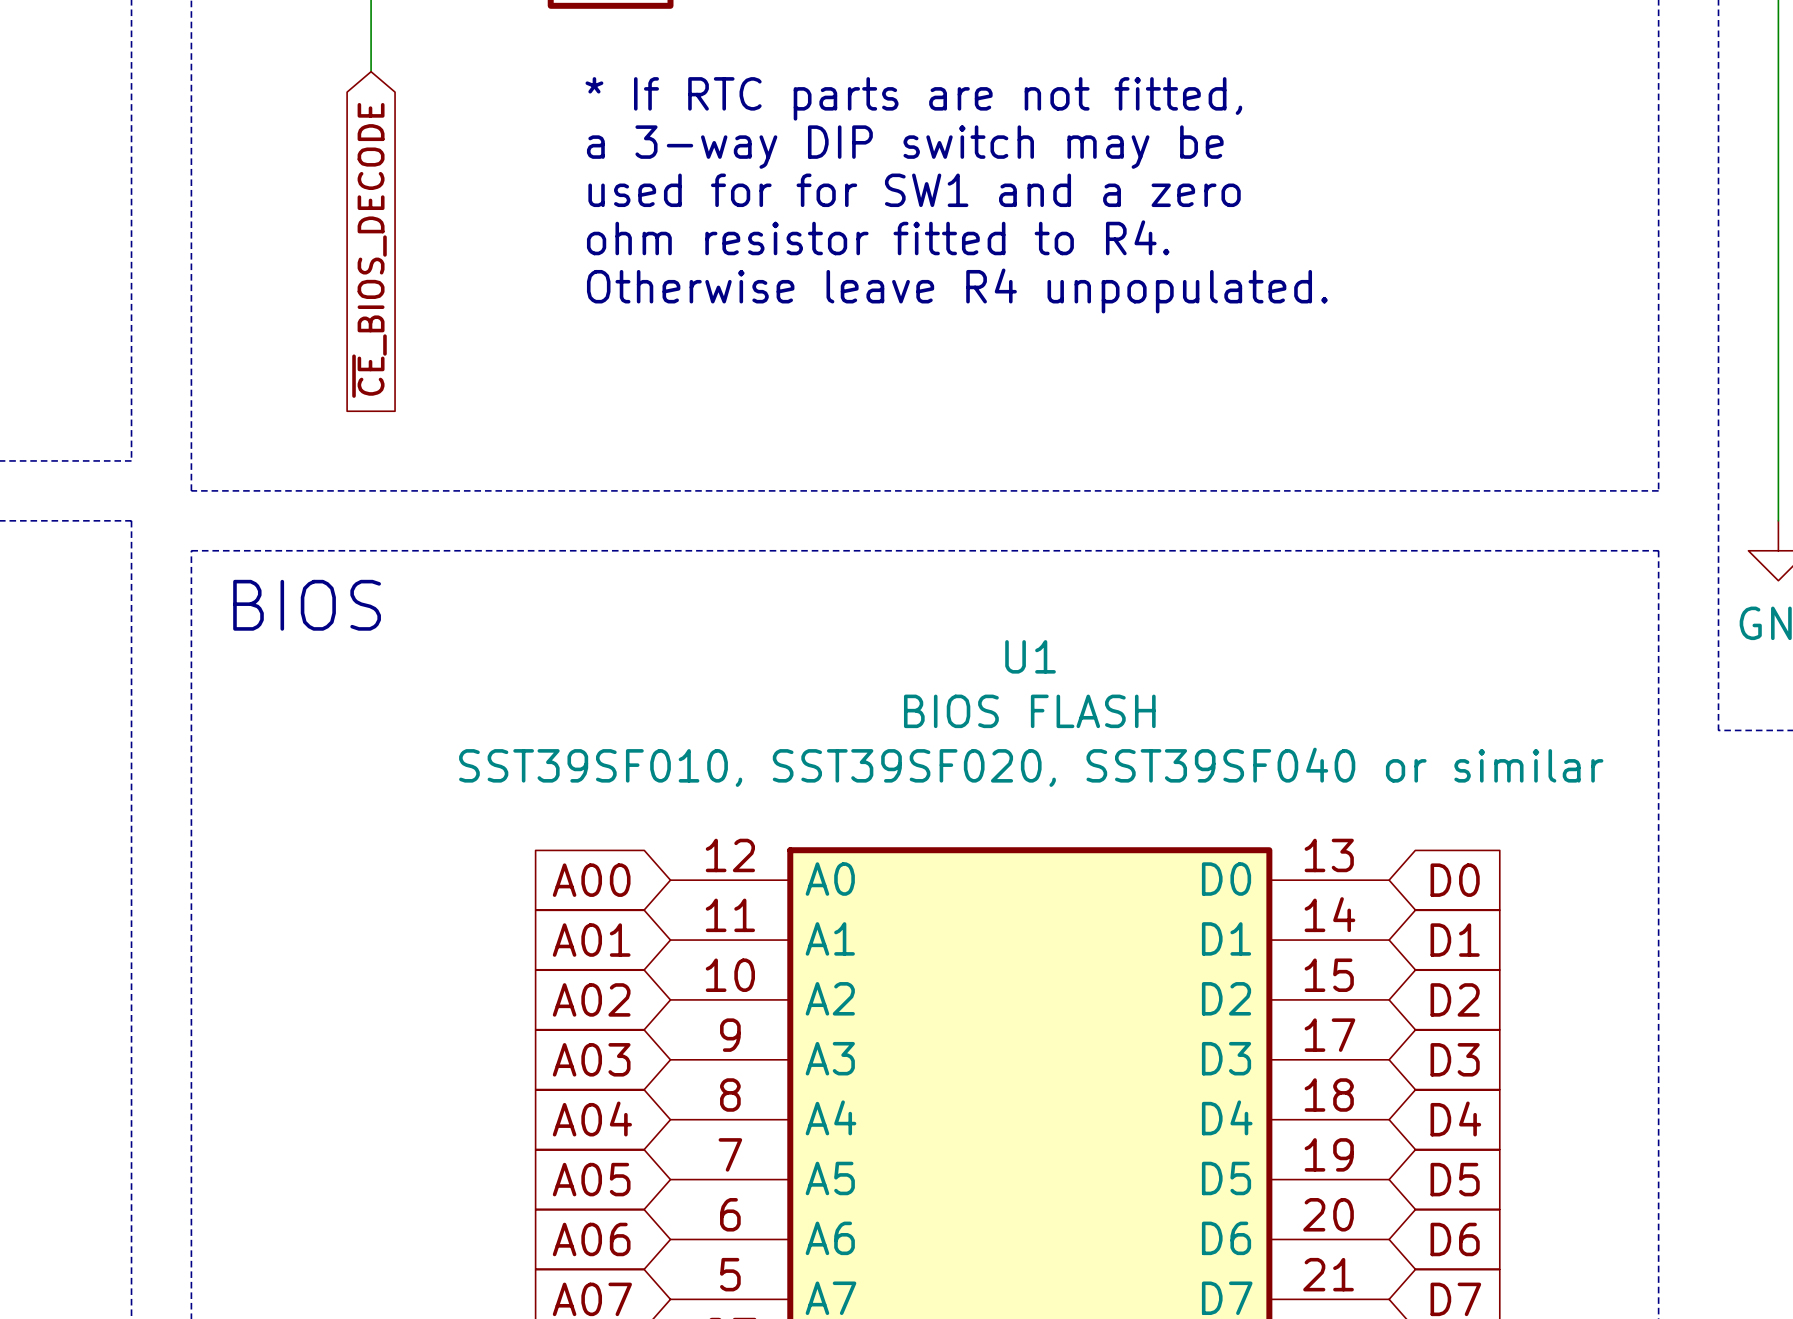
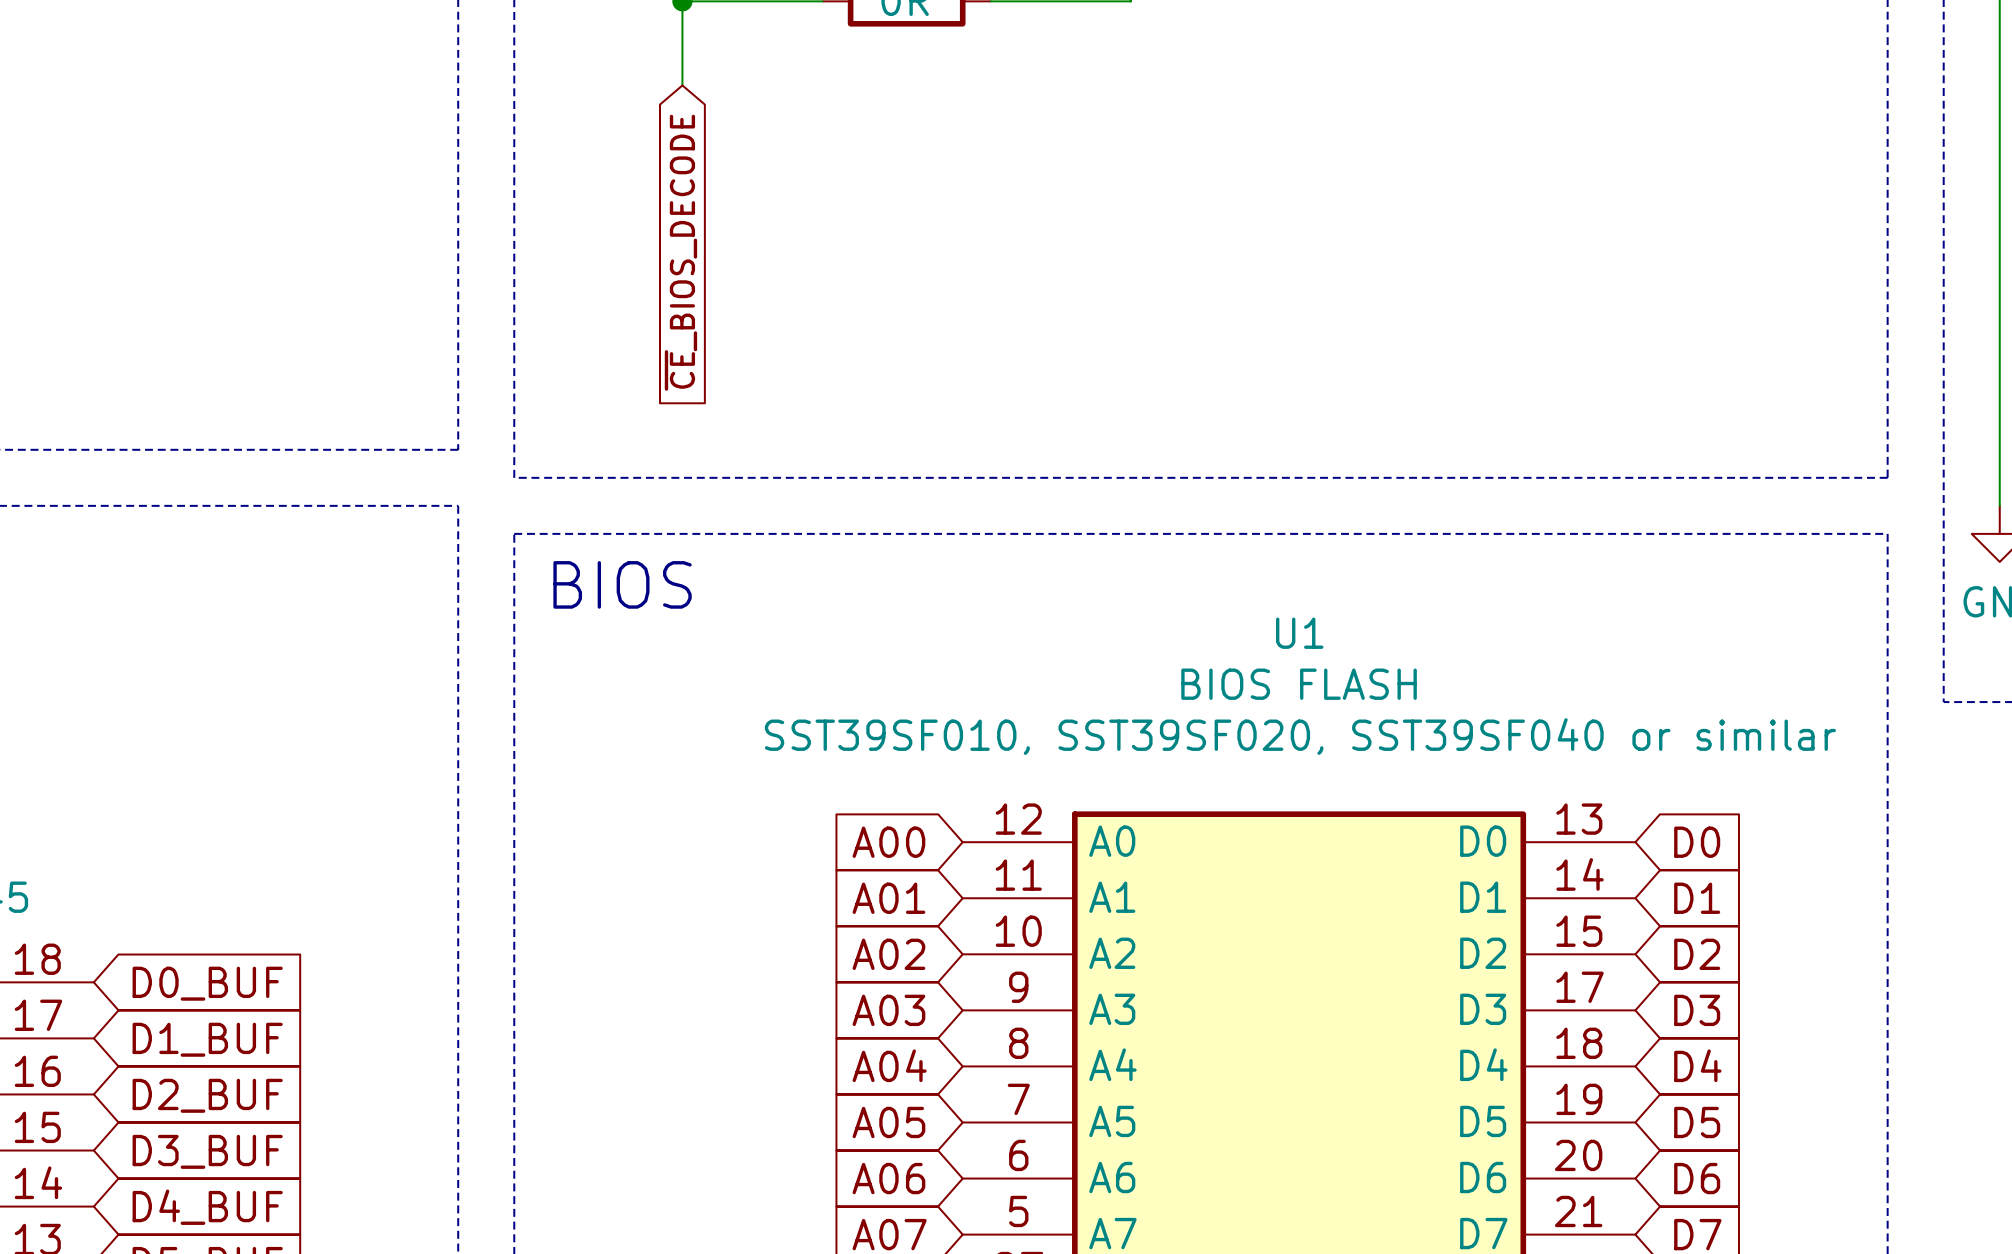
text: * If RTC parts are not fitted, (913, 98) -> none
text: a 3-way DIP switch may be (905, 147) -> none
text: used for for SW1 and a zero (914, 190) -> none
text: ohm resistor fitted to R4. (878, 237) -> none
text: Otherwise leave R4 unpopulated. (957, 290) -> none

